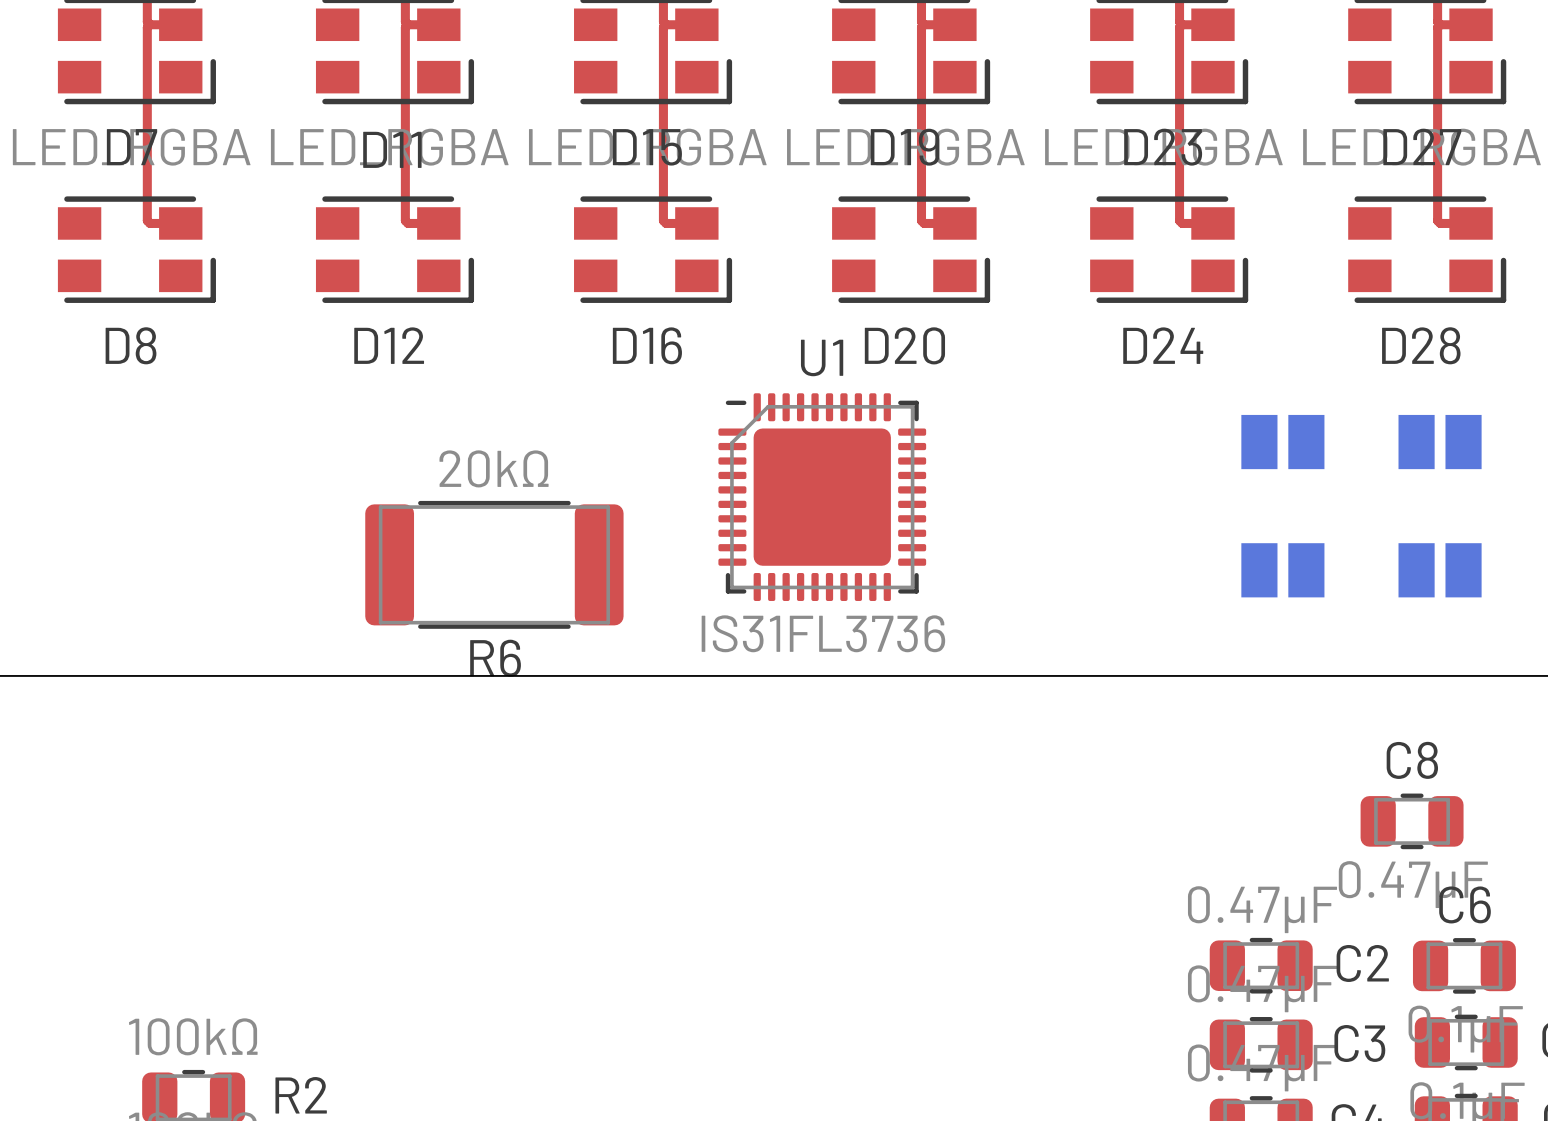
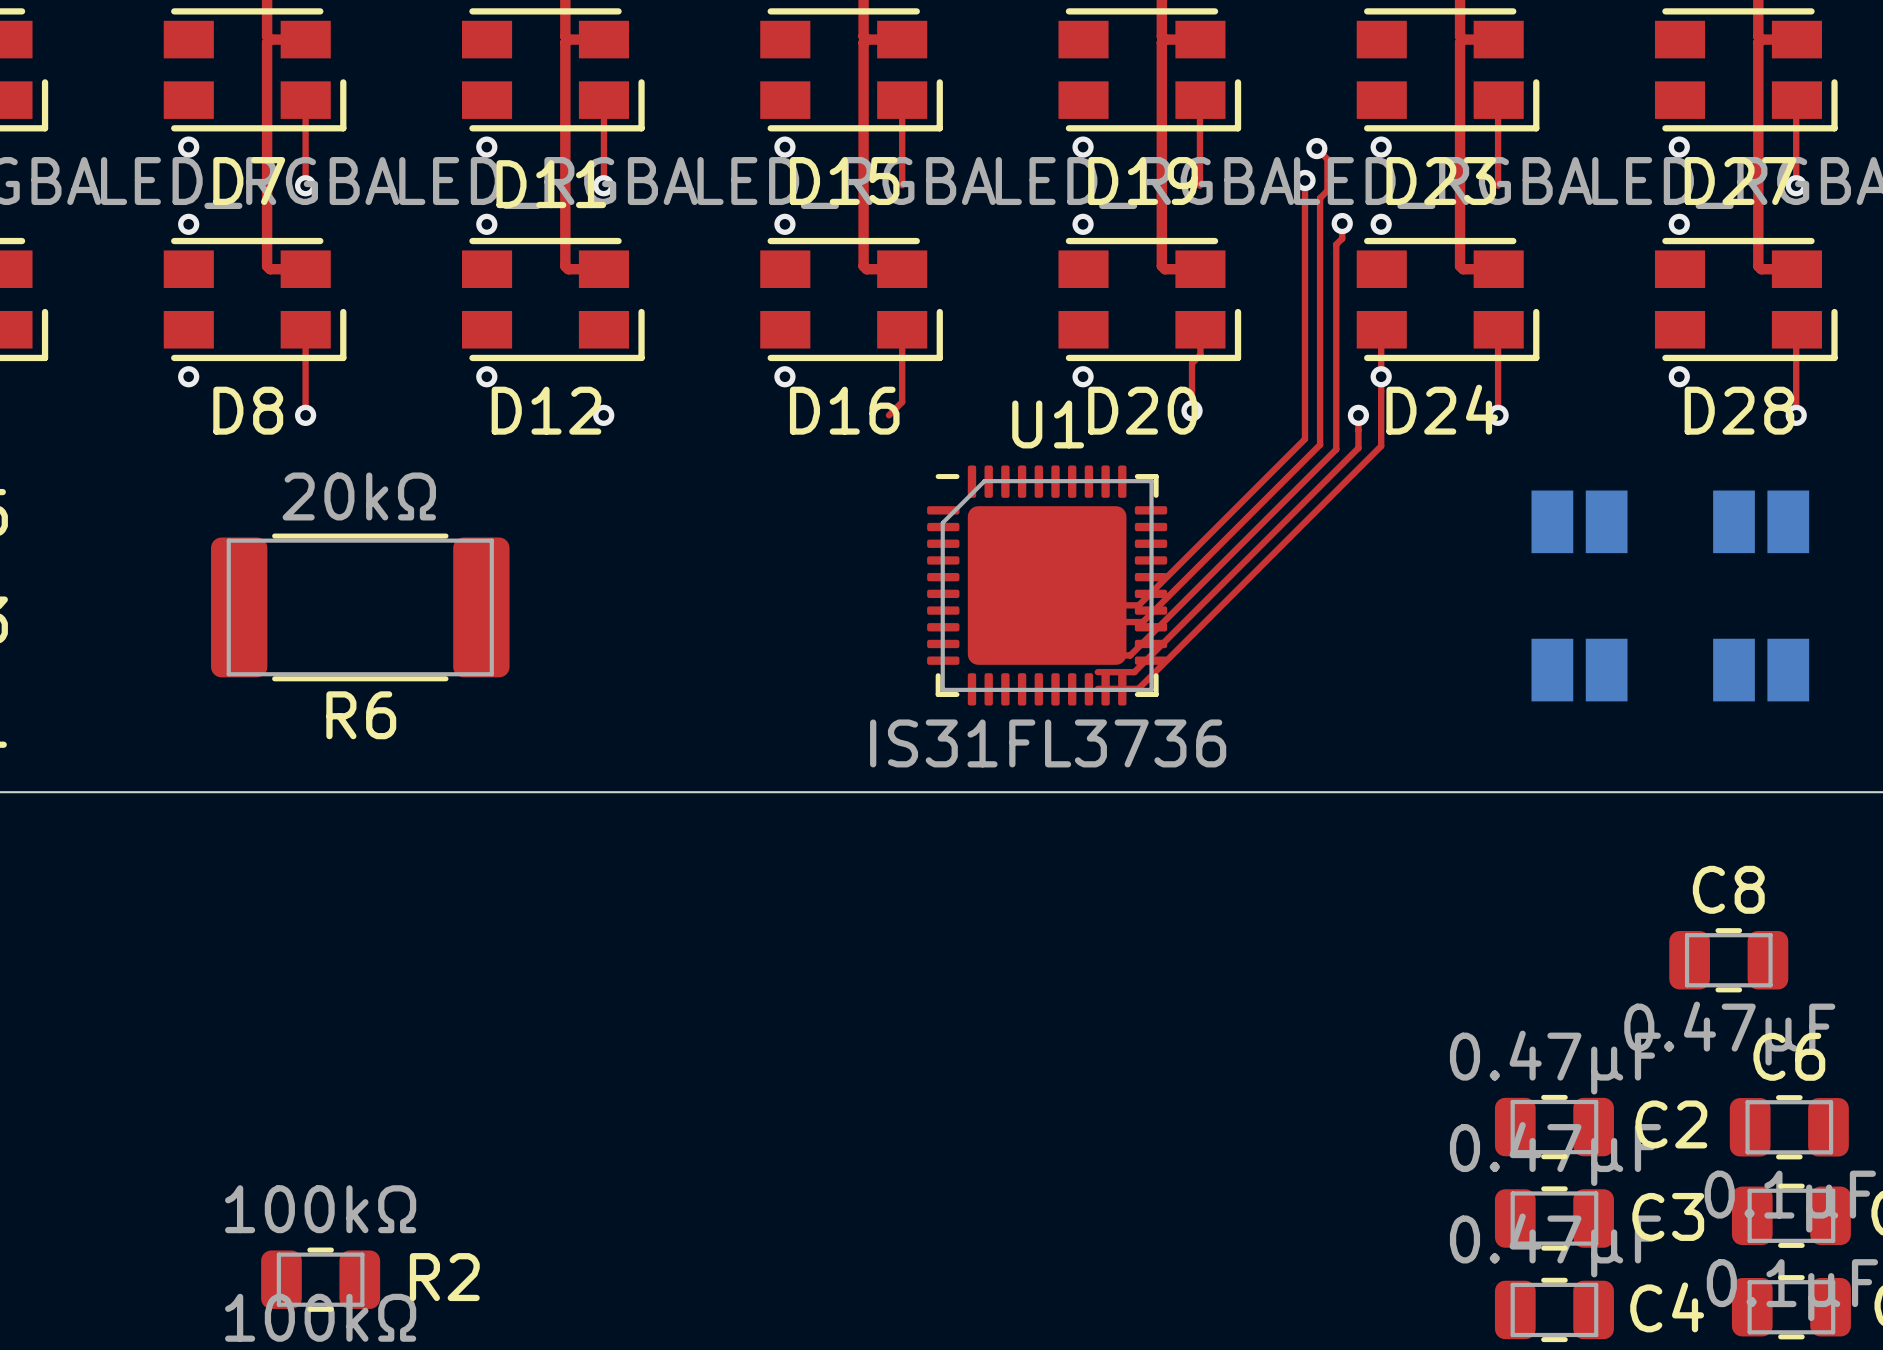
top track: none -> (305, 100) (305, 185)
top track: none -> (603, 100) (603, 185)
top track: none -> (902, 100) (902, 185)
top track: none -> (1199, 100) (1199, 185)
top track: none -> (1498, 100) (1498, 185)
top track: none -> (1796, 100) (1796, 185)
via: none -> (188, 147)
via: none -> (486, 147)
via: none -> (784, 147)
via: none -> (1083, 147)
via: none -> (1381, 147)
via: none -> (1679, 147)
top track: none -> (1316, 148) (1327, 159) (1327, 190) (1320, 198) (1320, 444) (1142, 622) (1097, 622)
via: none -> (1316, 148)
top track: none -> (1305, 180) (1305, 439) (1138, 605) (1097, 605)
via: none -> (1305, 180)
via: none -> (305, 185)
via: none -> (603, 185)
via: none -> (1796, 185)
top track: none -> (1342, 223) (1342, 238) (1336, 244) (1336, 449) (1130, 655) (1097, 655)
via: none -> (1342, 223)
via: none -> (188, 224)
via: none -> (486, 224)
via: none -> (784, 224)
via: none -> (1083, 224)
via: none -> (1381, 224)
via: none -> (1679, 224)
top track: none -> (305, 329) (305, 415)
top track: none -> (902, 329) (902, 402) (888, 415)
top track: none -> (1200, 329) (1200, 354) (1192, 363) (1192, 410)
top track: none -> (1381, 329) (1381, 446) (1138, 688) (1097, 688)
top track: none -> (1498, 329) (1498, 415)
top track: none -> (1796, 329) (1796, 415)
via: none -> (188, 376)
via: none -> (486, 376)
via: none -> (784, 376)
via: none -> (1083, 376)
via: none -> (1381, 376)
via: none -> (1679, 376)
via: none -> (1192, 410)
via: none -> (305, 415)
via: none -> (603, 415)
top track: none -> (1358, 415) (1358, 448) (1134, 672) (1097, 672)
via: none -> (1358, 415)
via: none -> (1498, 415)
via: none -> (1796, 415)
R6 position: (494, 564) -> (360, 607)

